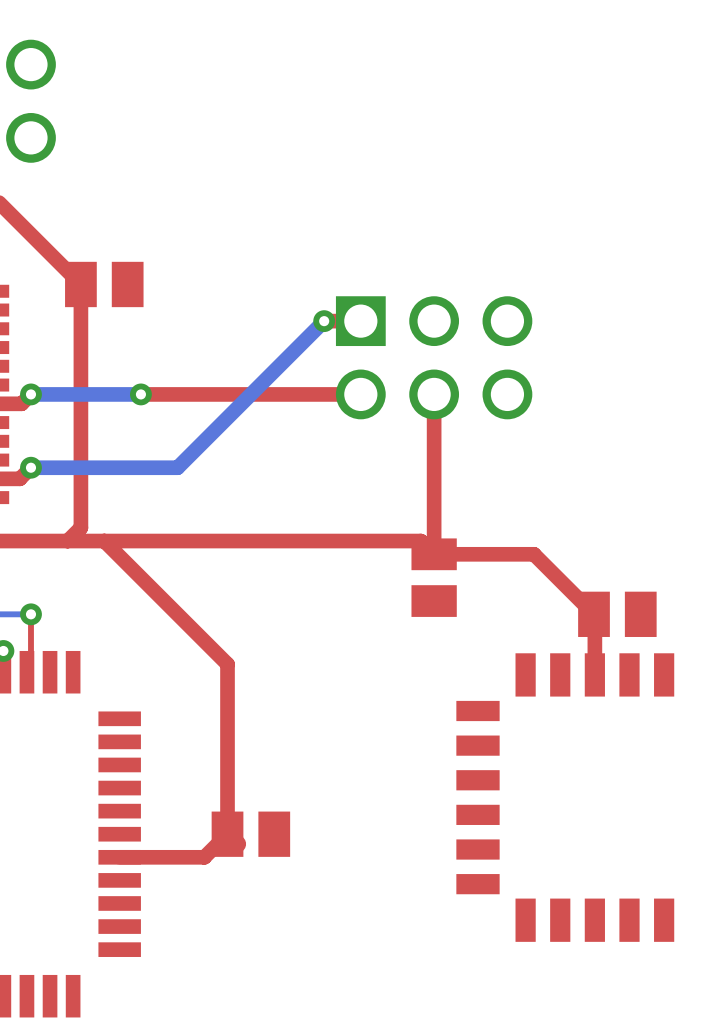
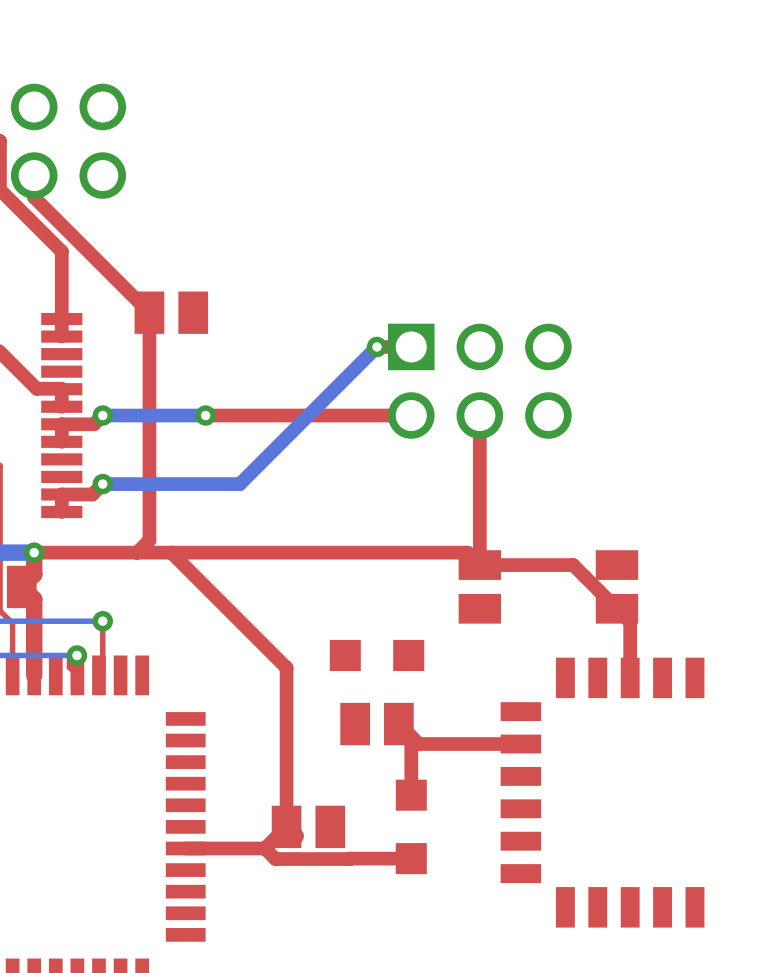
part rotation: 0° (617, 614) -> 90° clockwise (616, 586)
part position: (617, 614) -> (616, 586)
part: none -> (377, 655)
part: none -> (377, 724)
top track: none -> (398, 724) (418, 744) (520, 744)
top track: none -> (411, 736) (411, 795)
part: none -> (411, 826)
top track: none -> (264, 848) (275, 859) (411, 858)

